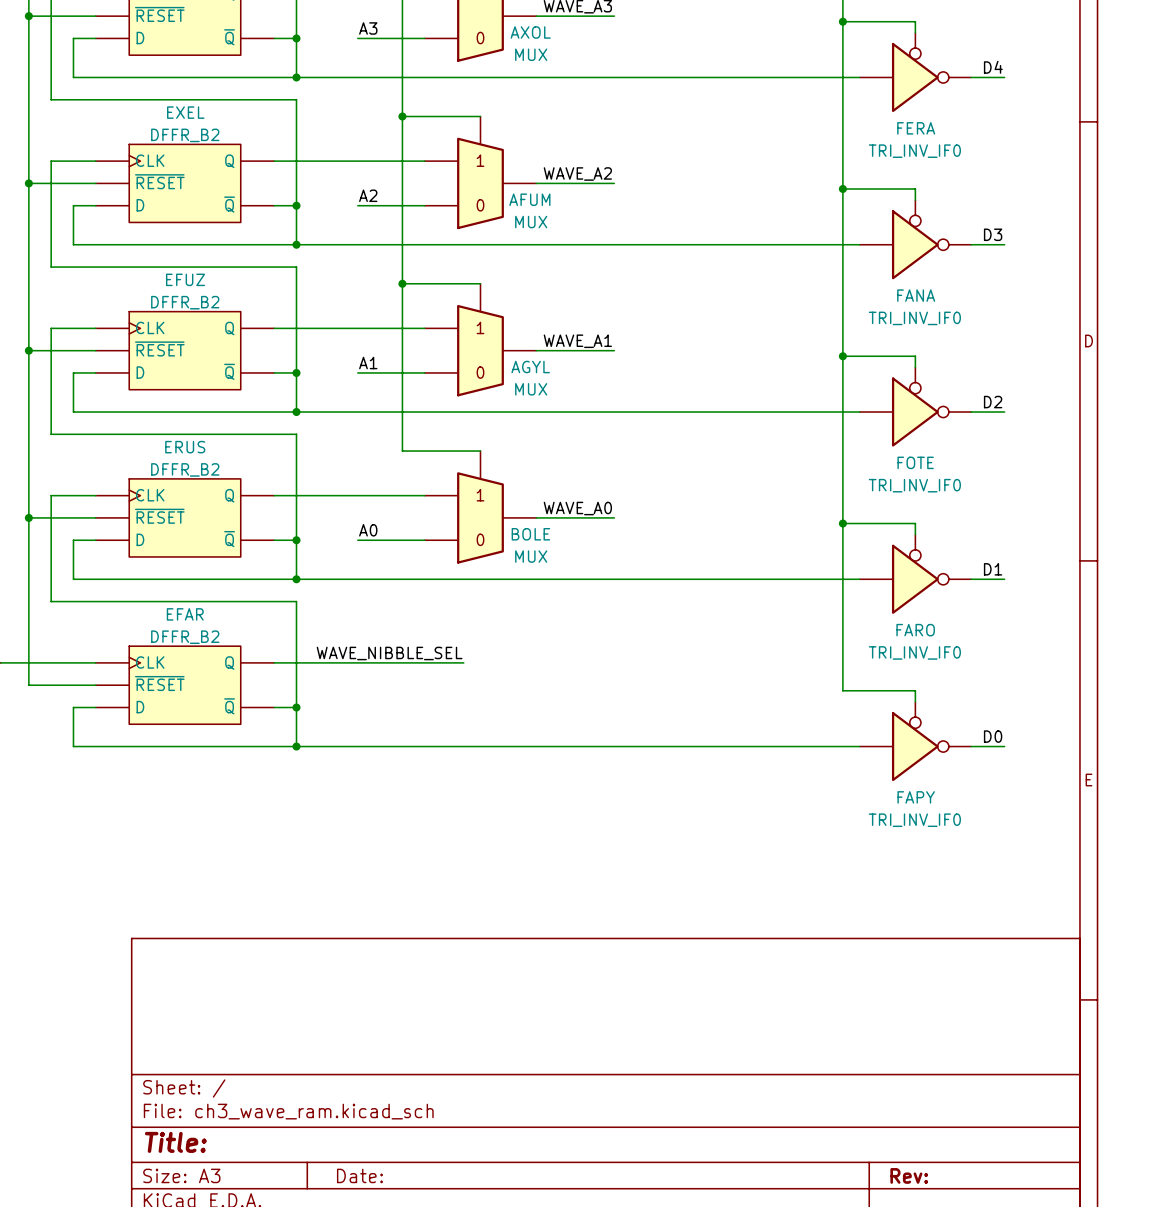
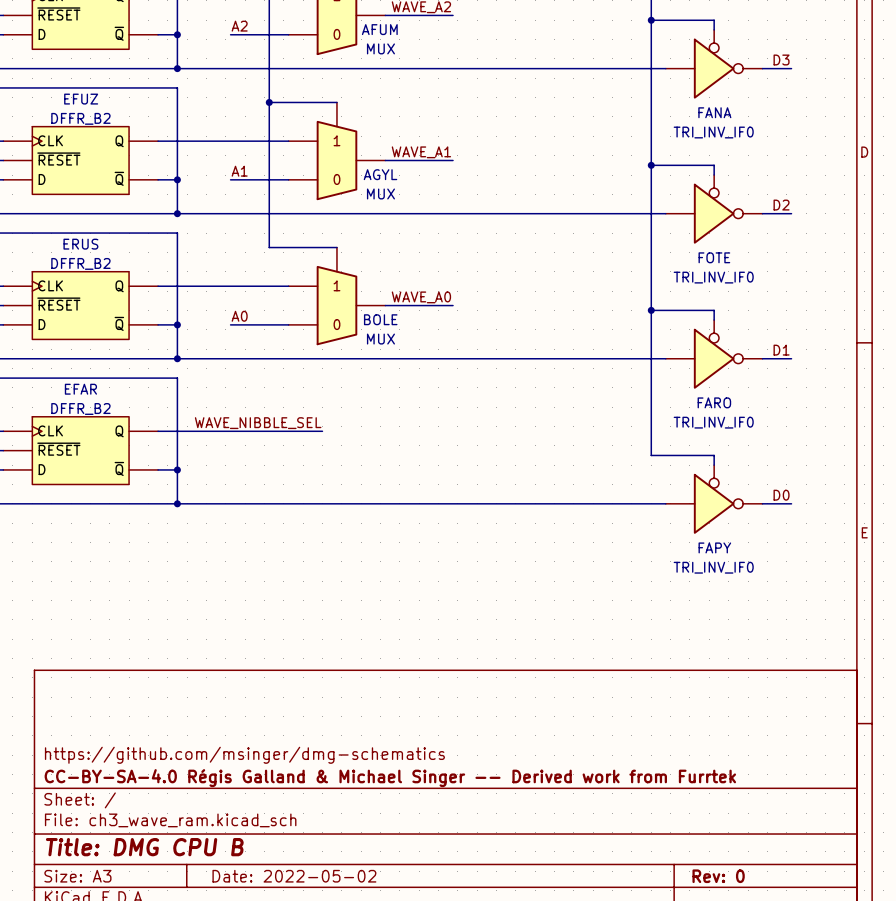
title block: none -> https://github.com/msinger/dmg-schematics (244, 755)
title block: none -> CC-BY-SA-4.0 Régis Galland & Michael Singer -- Derived work from Furrtek (390, 778)
title block: Title: (175, 1142) -> Title: DMG CPU B (144, 847)
title block: Date: (359, 1175) -> Date: 2022-05-02 (294, 876)
title block: Rev: (909, 1175) -> Rev: 0 (718, 876)

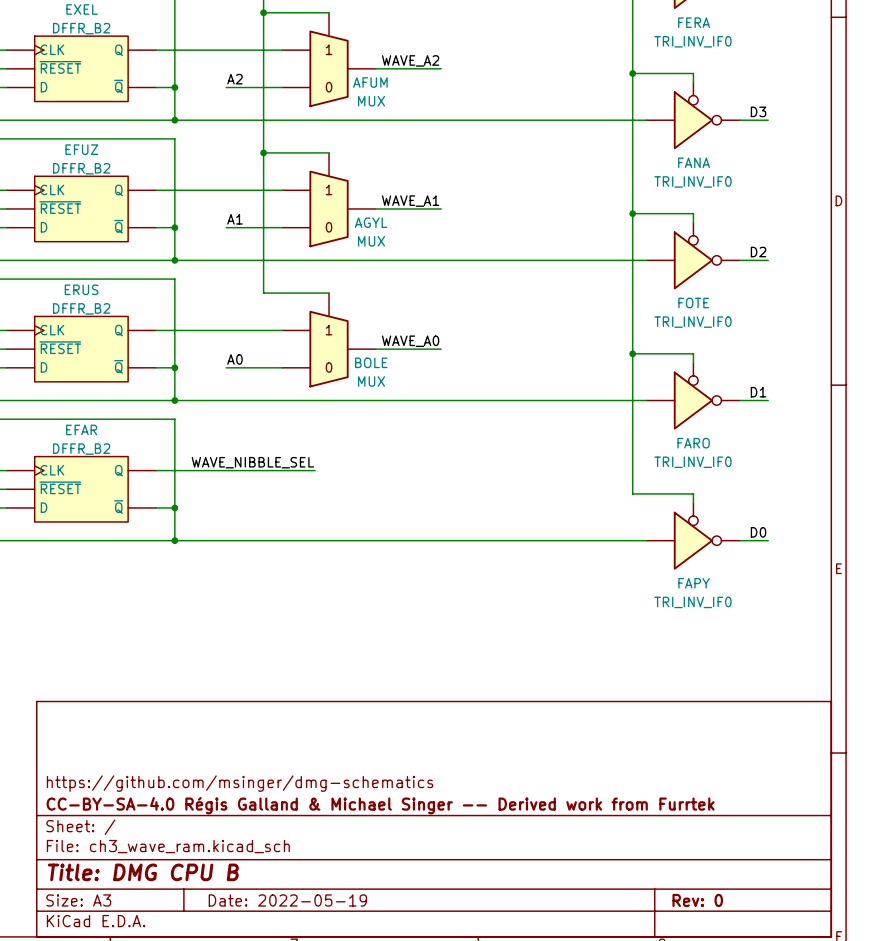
title block: Date: 2022-05-02 (294, 876) -> Date: 2022-05-19 (287, 900)

